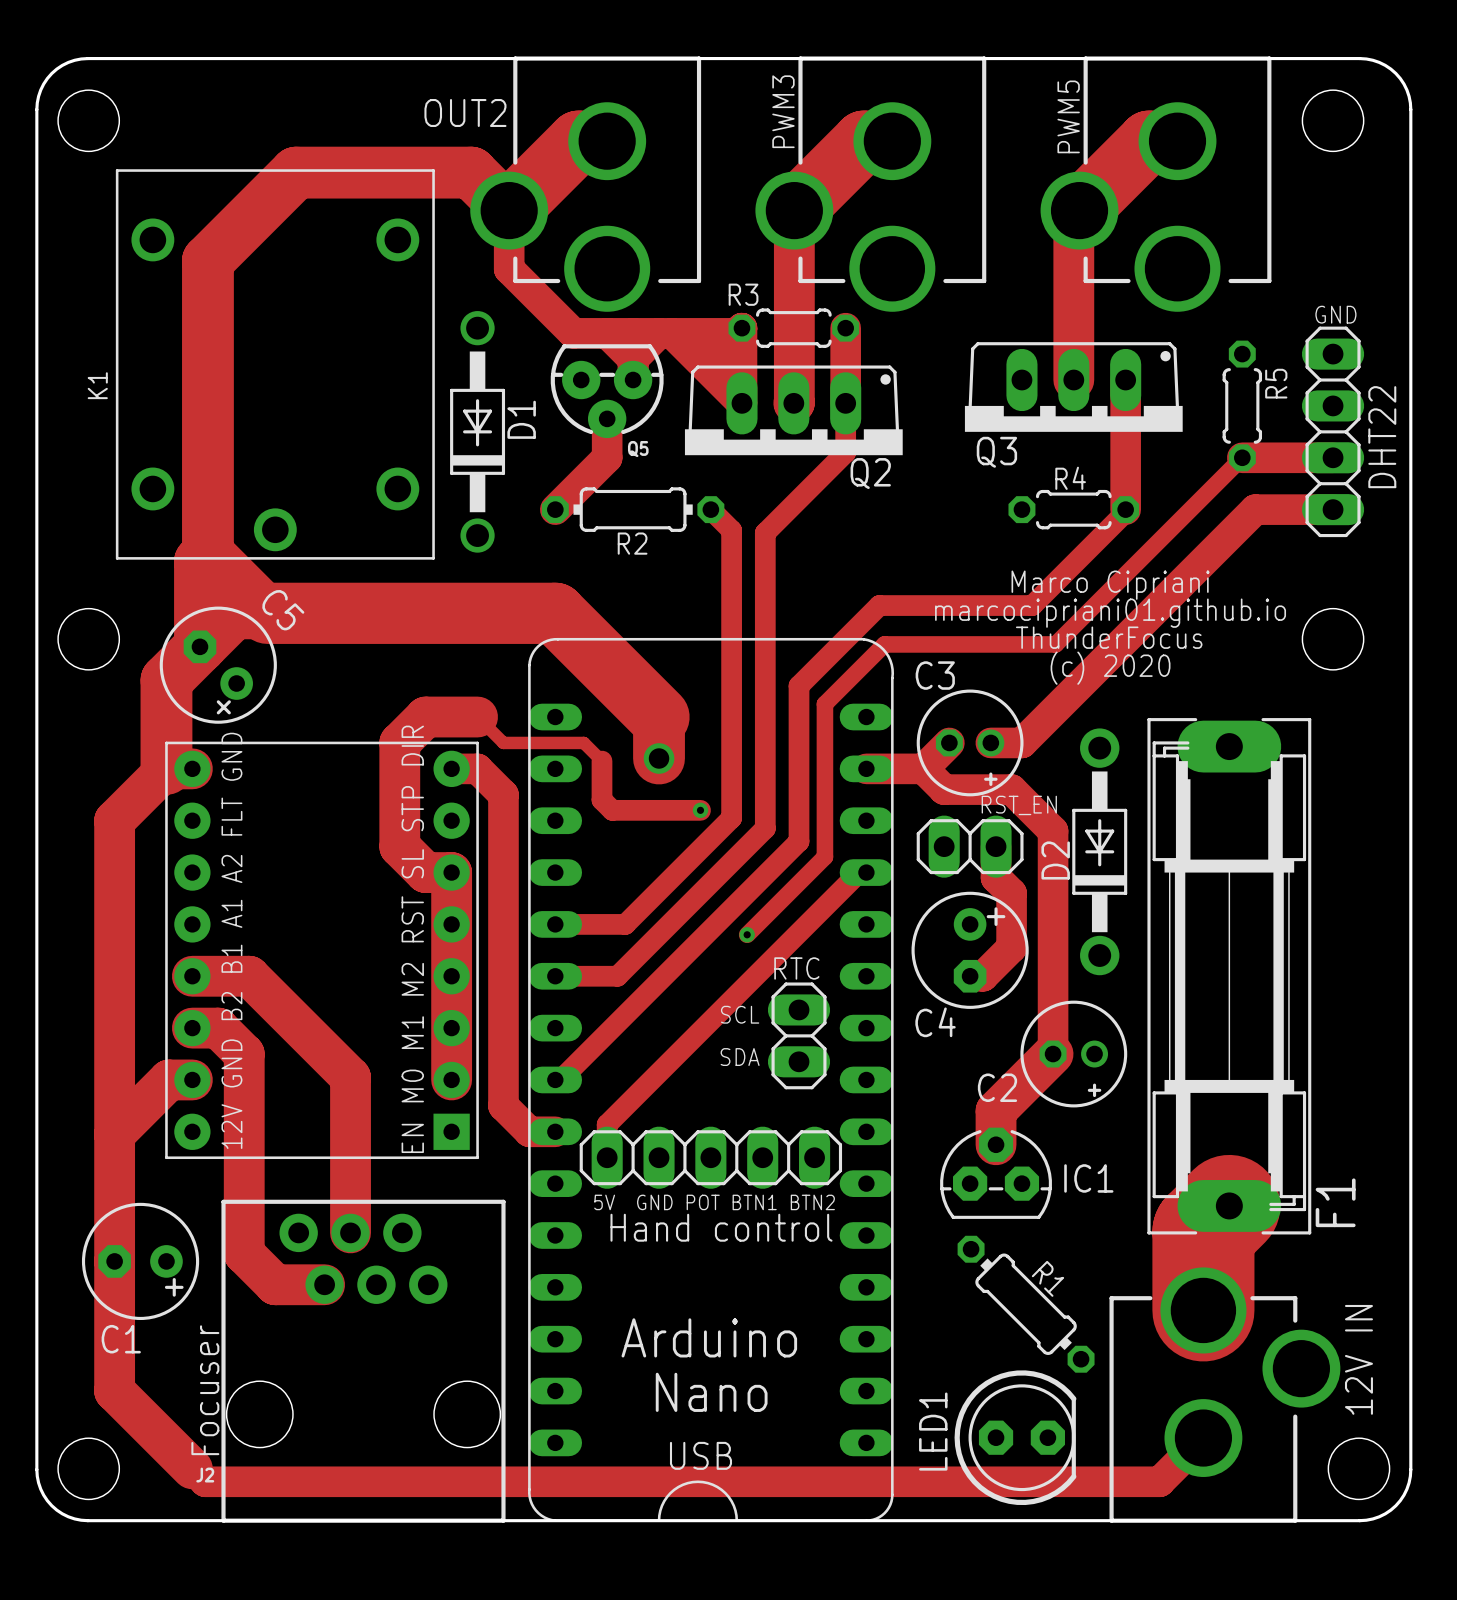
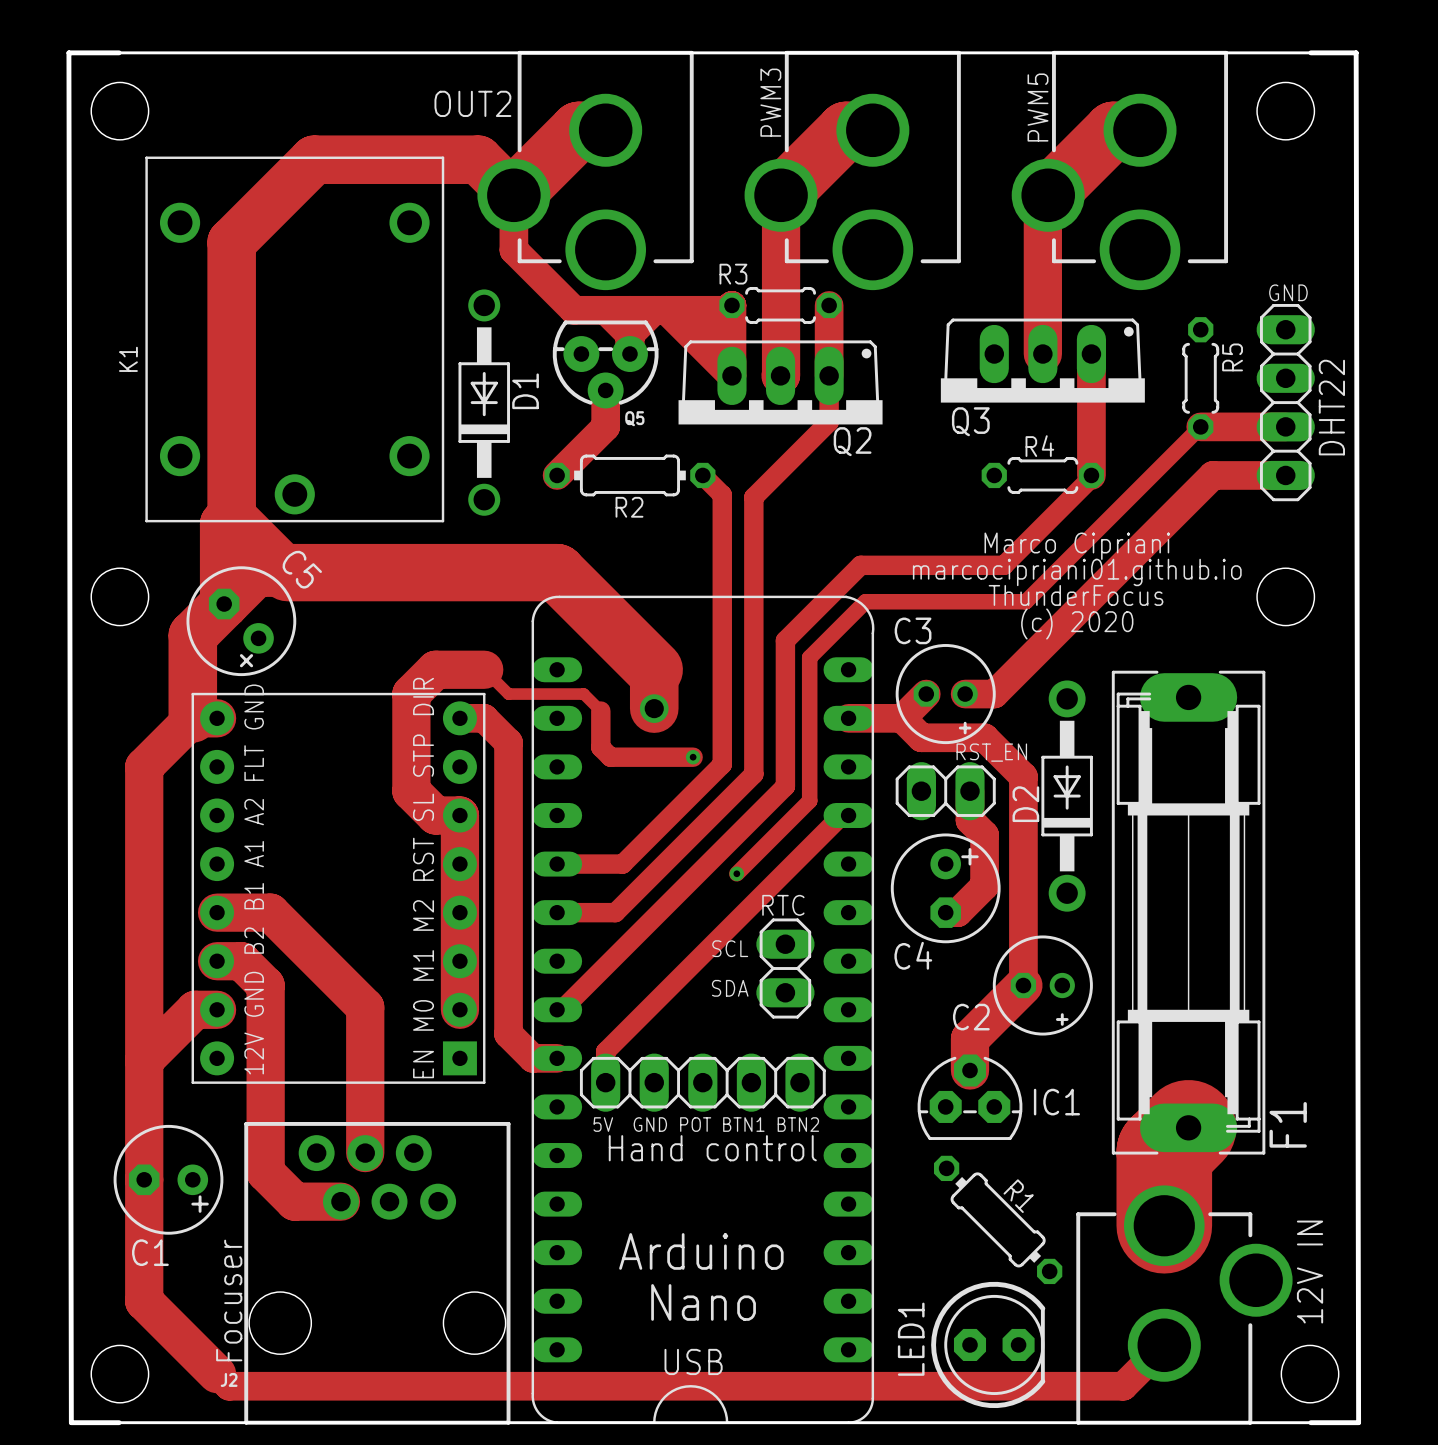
board edge: (87, 58) (68, 62) (51, 73) (40, 90) (36, 109) (36, 1469) (40, 1489) (51, 1505) (68, 1516) (87, 1520) -> (119, 52) (68, 52) (71, 1422) (119, 1422)
board edge: (1359, 58) (1379, 62) (1395, 73) (1406, 90) (1410, 109) (1410, 1469) (1406, 1489) (1395, 1505) (1379, 1516) (1359, 1520) -> (1310, 52) (1356, 52) (1358, 1422) (1310, 1422)

